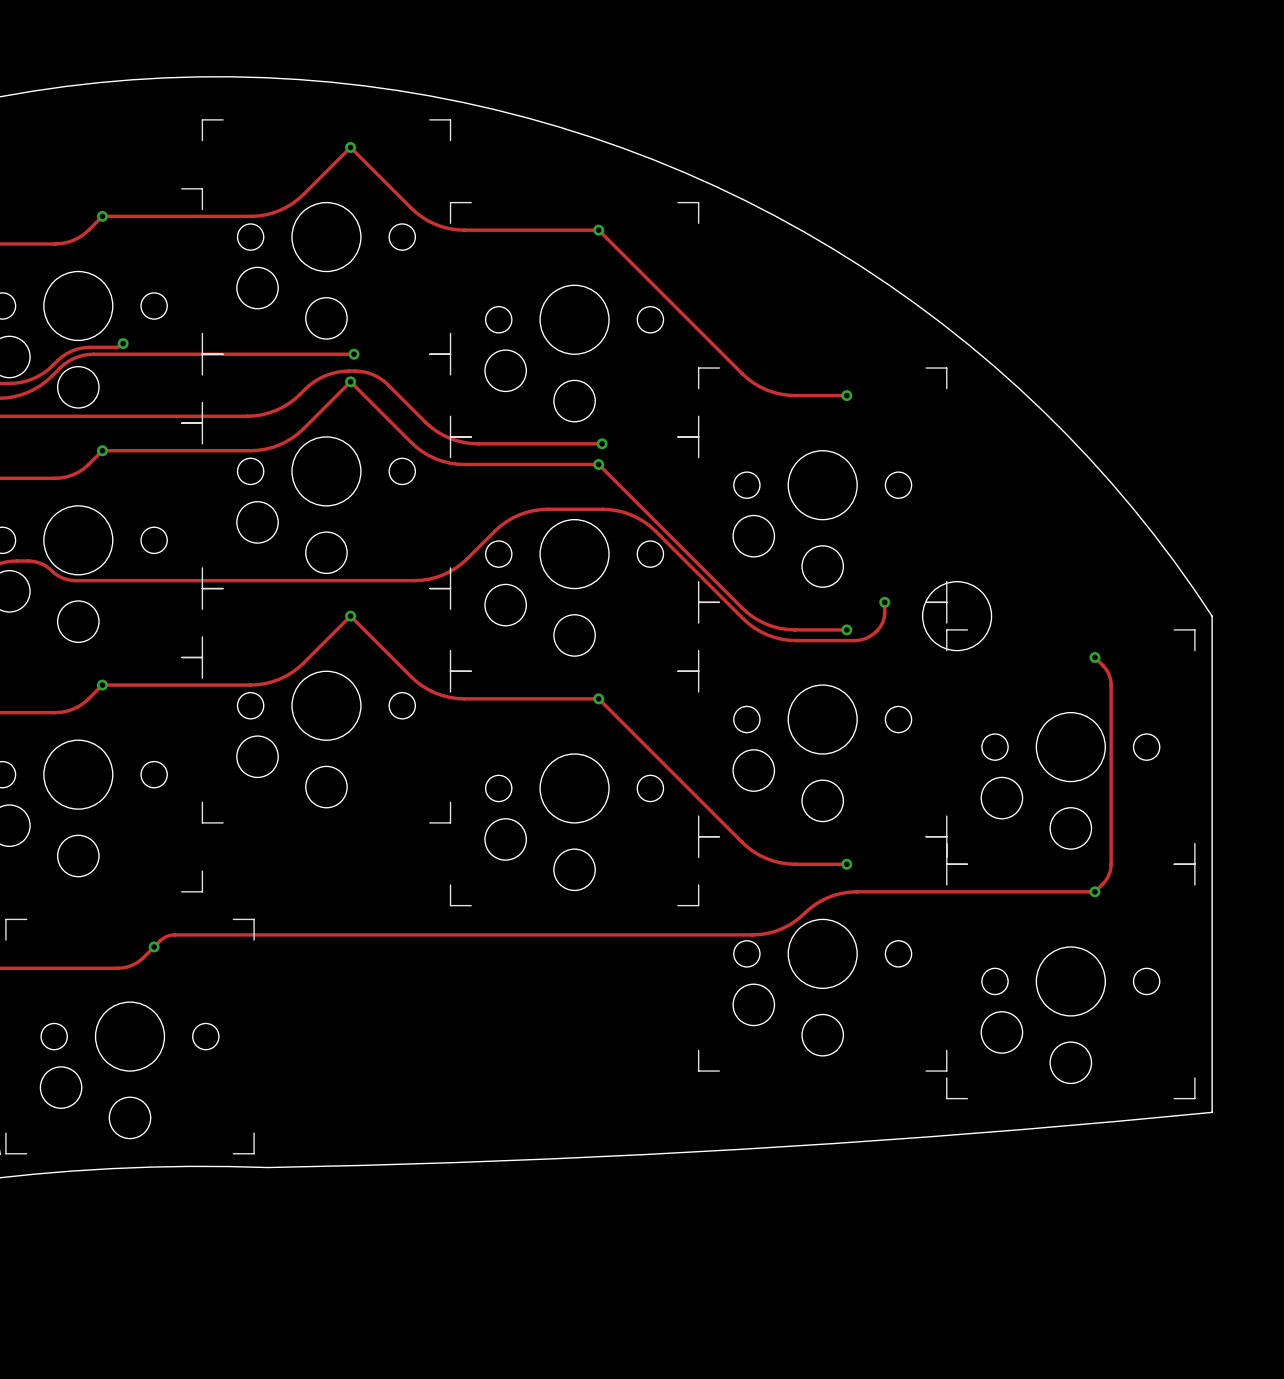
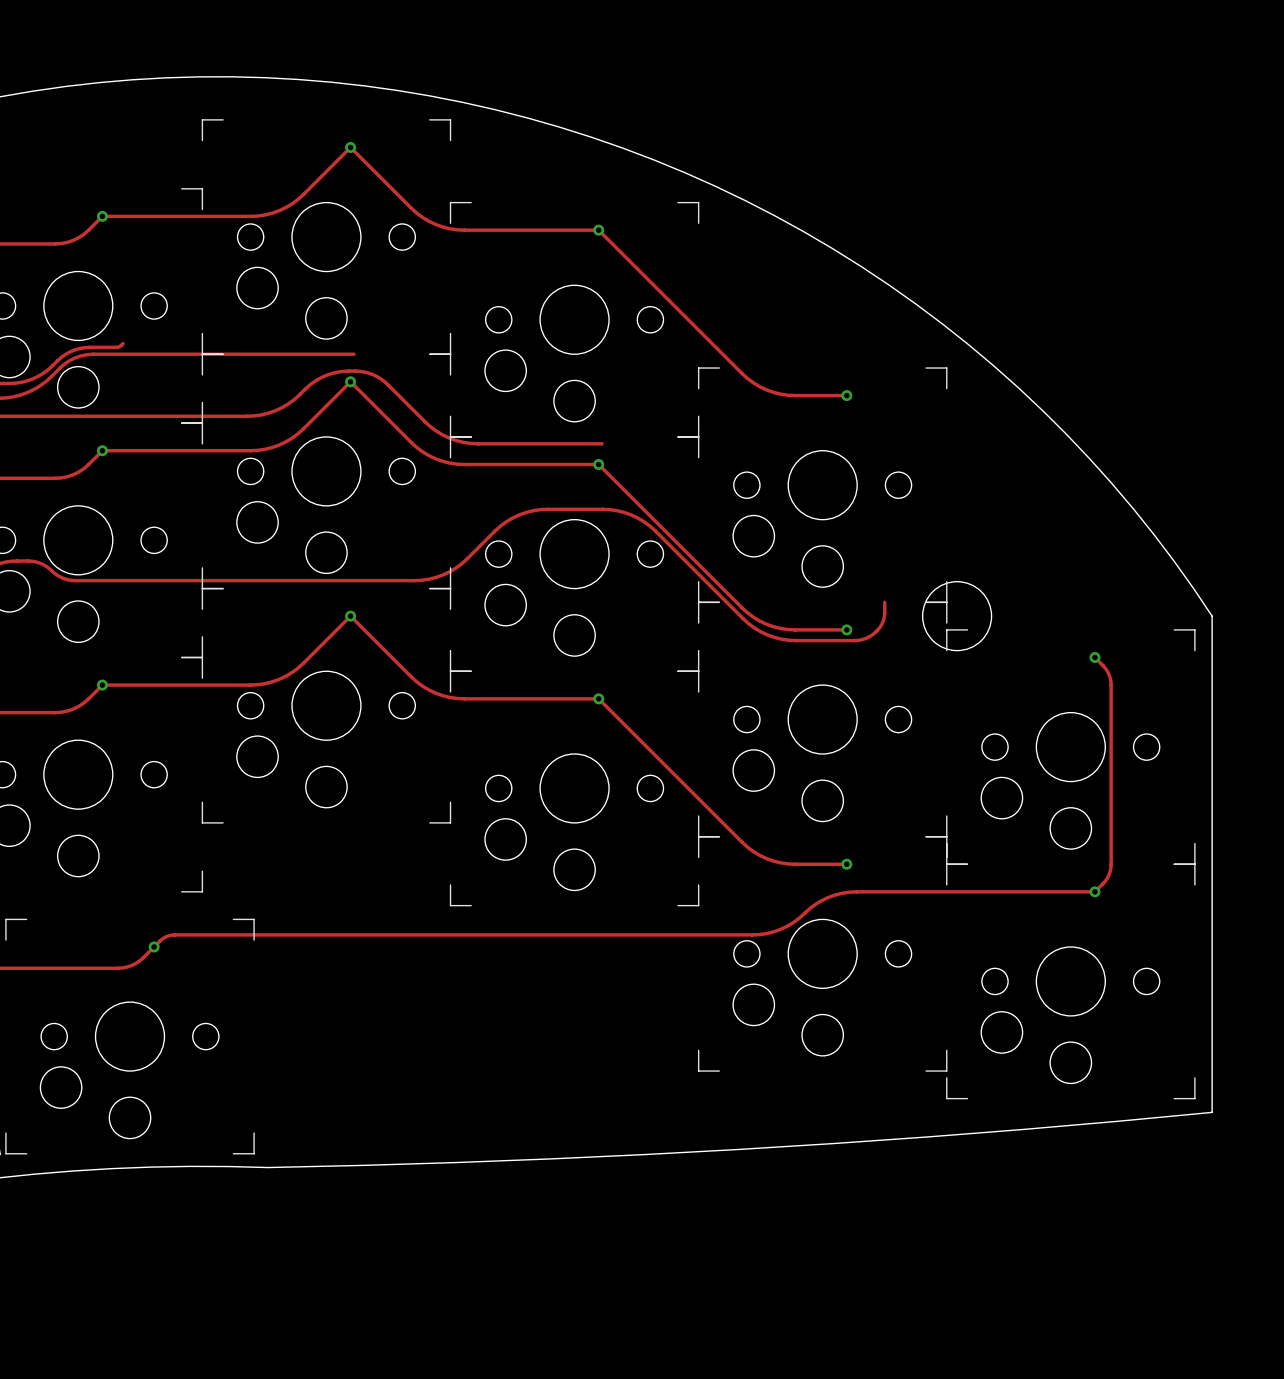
via: (123, 343) -> none
via: (354, 354) -> none
via: (602, 443) -> none
via: (884, 602) -> none

